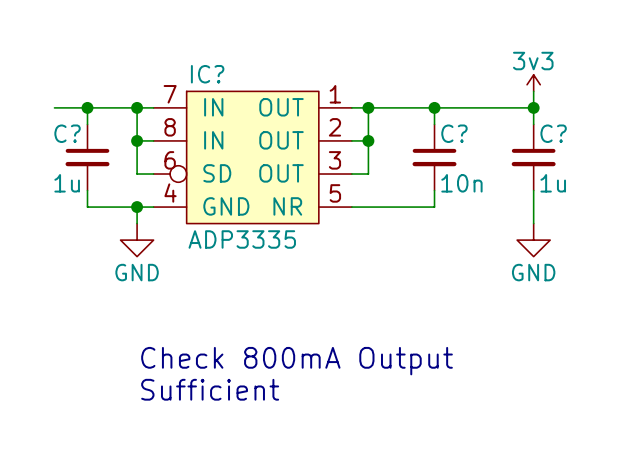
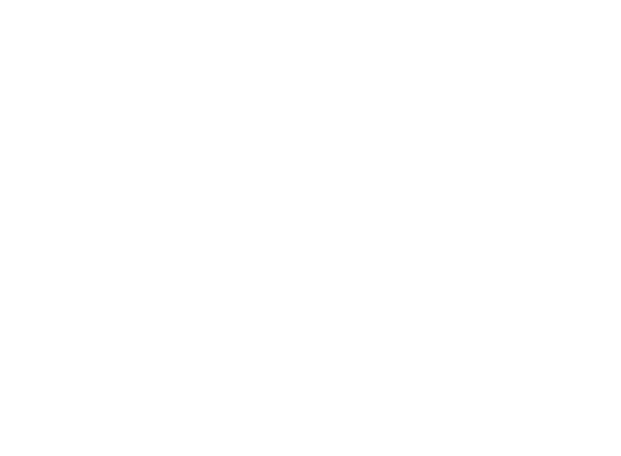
power symbol: 3v3 (533, 83) -> none
wire: (533, 91) (533, 124) -> none
wire: (54, 107) (153, 107) -> none
wire: (87, 107) (87, 124) -> none
junction: (87, 107) -> none
wire: (137, 107) (137, 174) (153, 174) -> none
junction: (137, 107) -> none
wire: (351, 107) (533, 107) -> none
wire: (368, 107) (368, 174) (351, 174) -> none
junction: (368, 107) -> none
wire: (434, 107) (434, 124) -> none
junction: (434, 107) -> none
junction: (533, 107) -> none
wire: (137, 140) (153, 140) -> none
junction: (137, 140) -> none
wire: (351, 140) (368, 140) -> none
junction: (368, 140) -> none
C?: 1u (87, 157) -> none
IC?: ADP3335 (252, 157) -> none
C?: 10n (434, 157) -> none
C?: 1u (533, 157) -> none
wire: (87, 190) (87, 207) (153, 207) -> none
wire: (434, 190) (434, 207) (351, 207) -> none
wire: (533, 190) (533, 223) -> none
wire: (137, 207) (137, 223) -> none
junction: (137, 207) -> none
power symbol: GND (137, 240) -> none
power symbol: GND (533, 240) -> none
text: Check 800mA Output (297, 361) -> none
text: Sufficient (210, 389) -> none

